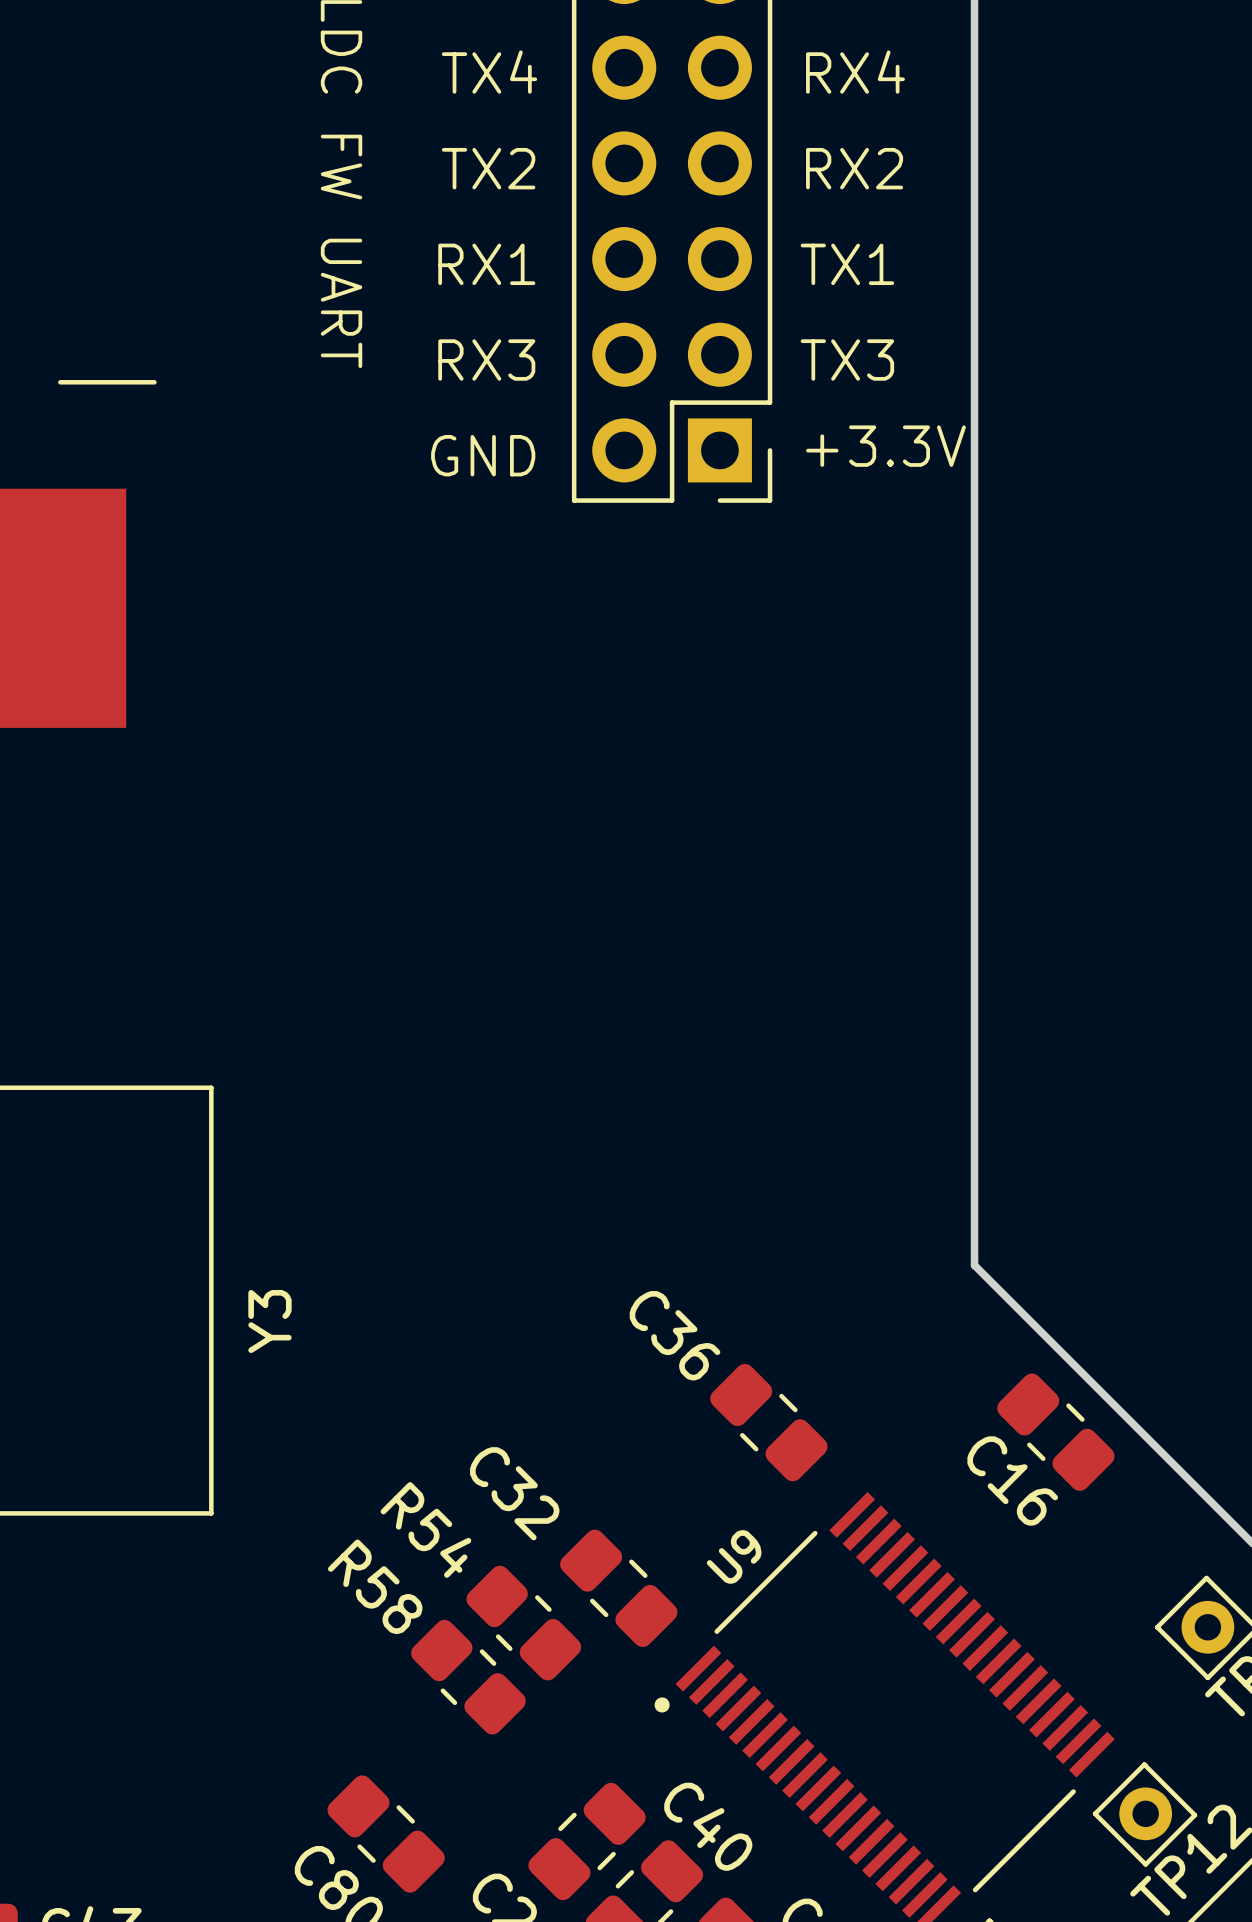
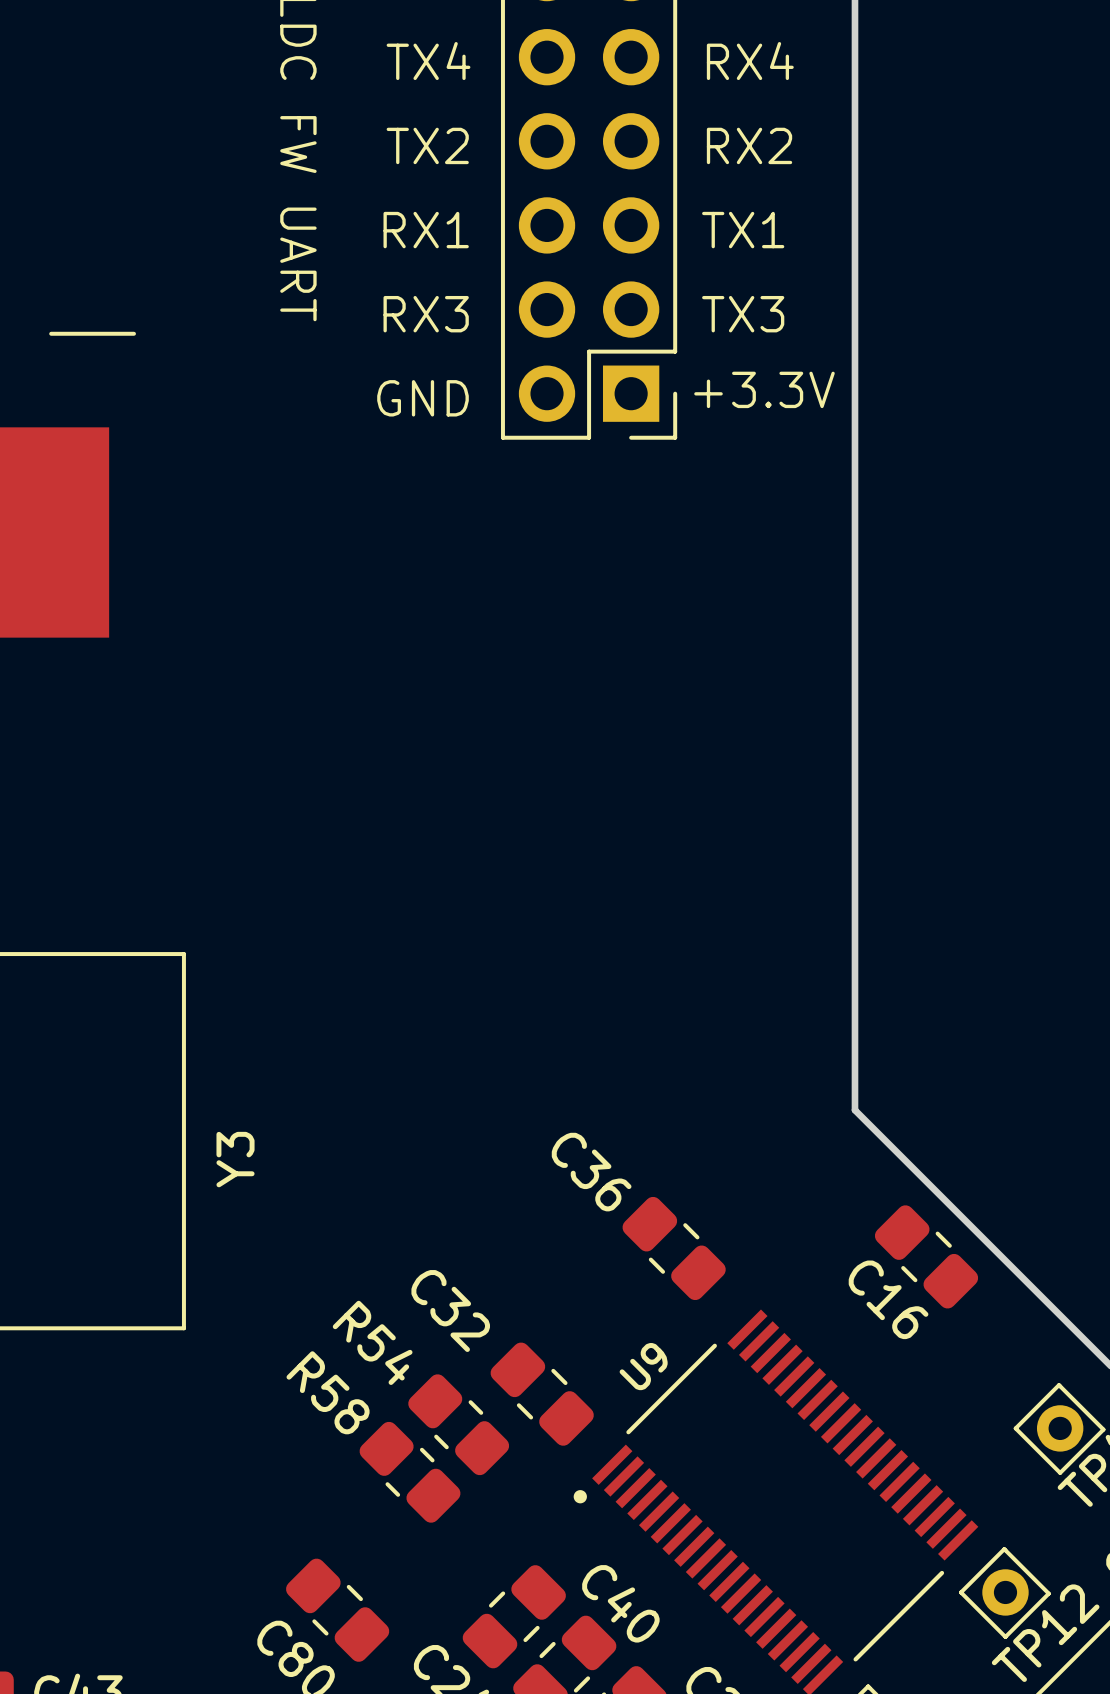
text position: +3.3V (885, 446) -> +3.3V (764, 389)

